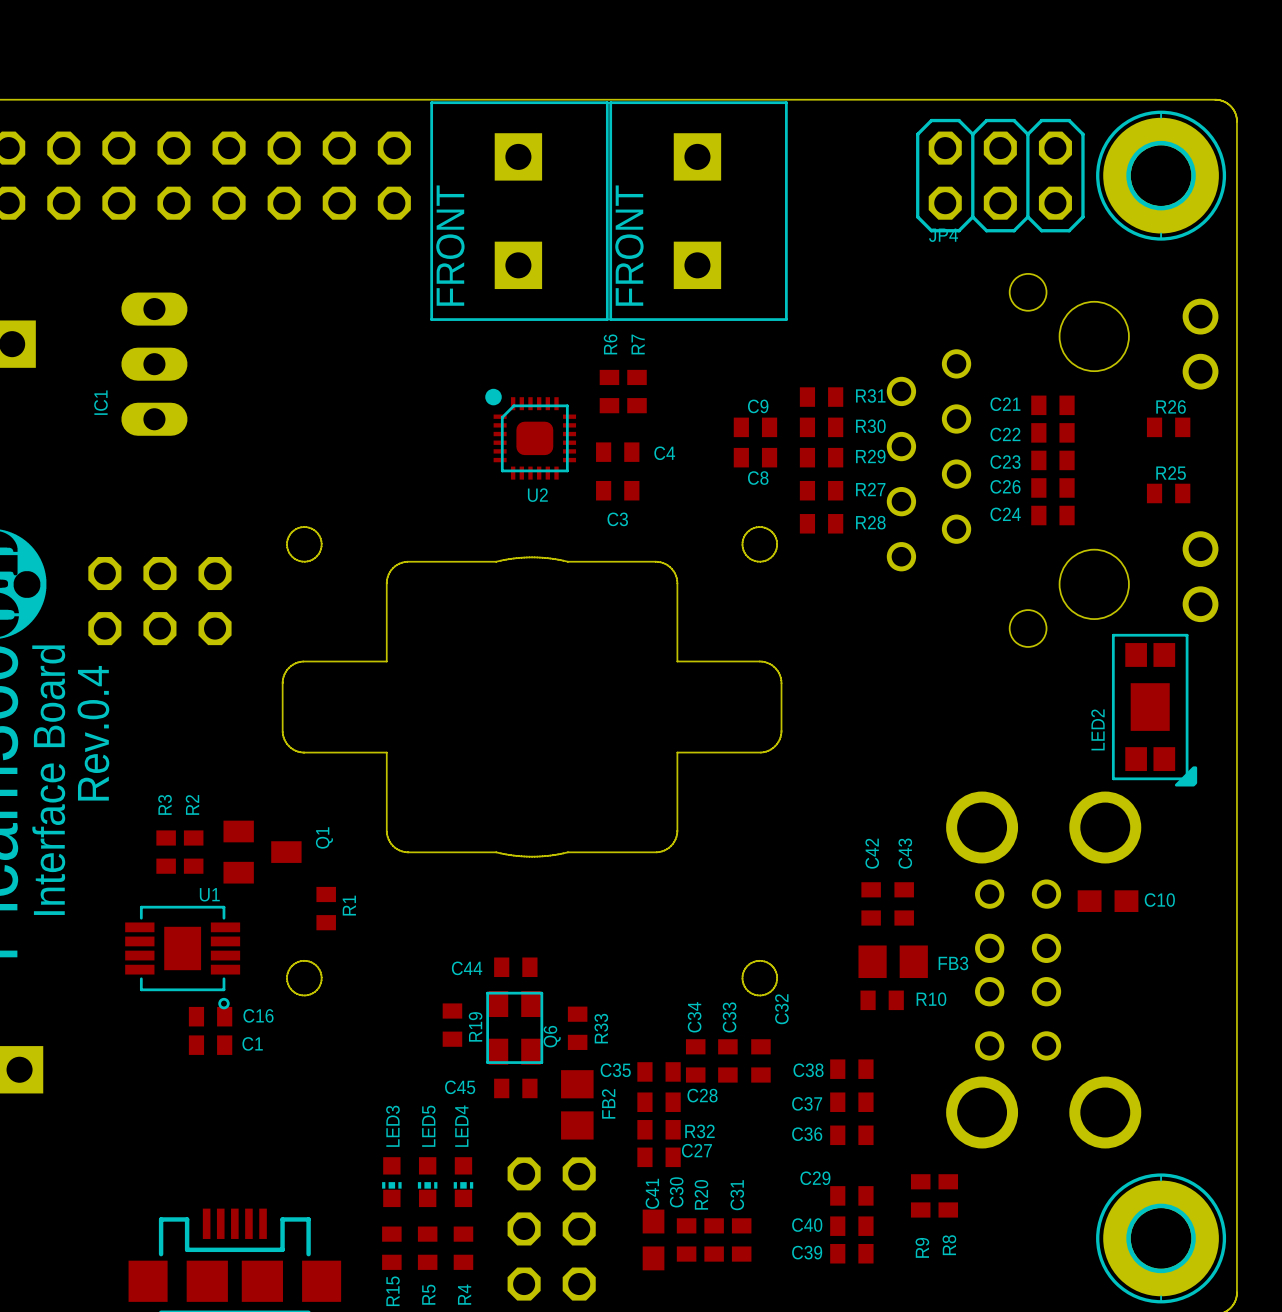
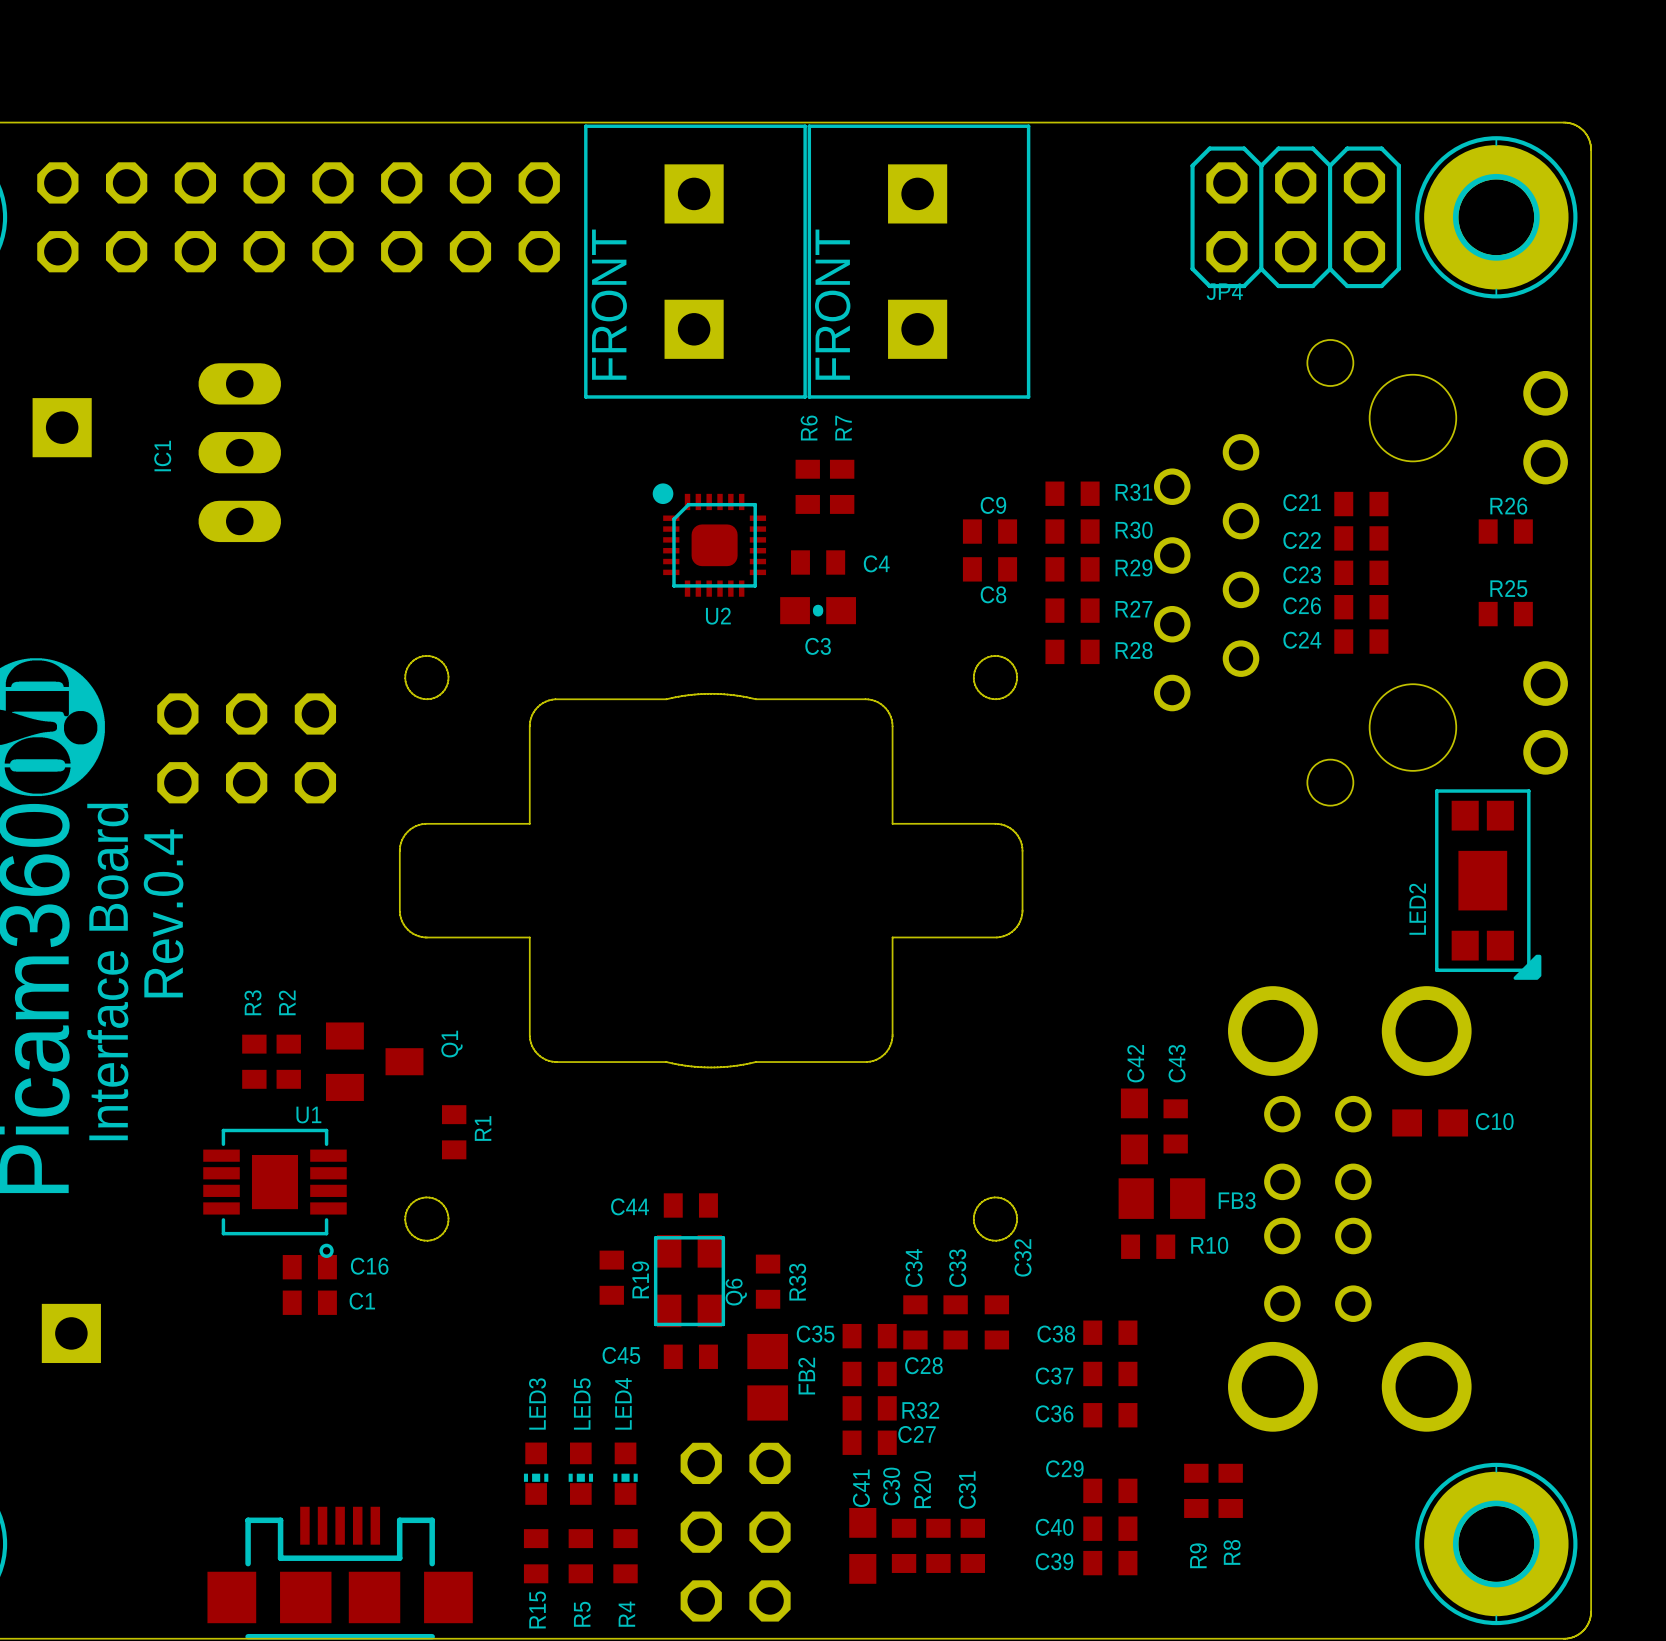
IC1 name position: IC1 (100, 402) -> IC1 (162, 456)
C3 footprint: [596, 480, 640, 501] -> [780, 597, 856, 625]
C42 footprint: [861, 882, 881, 926] -> [1120, 1088, 1148, 1165]

